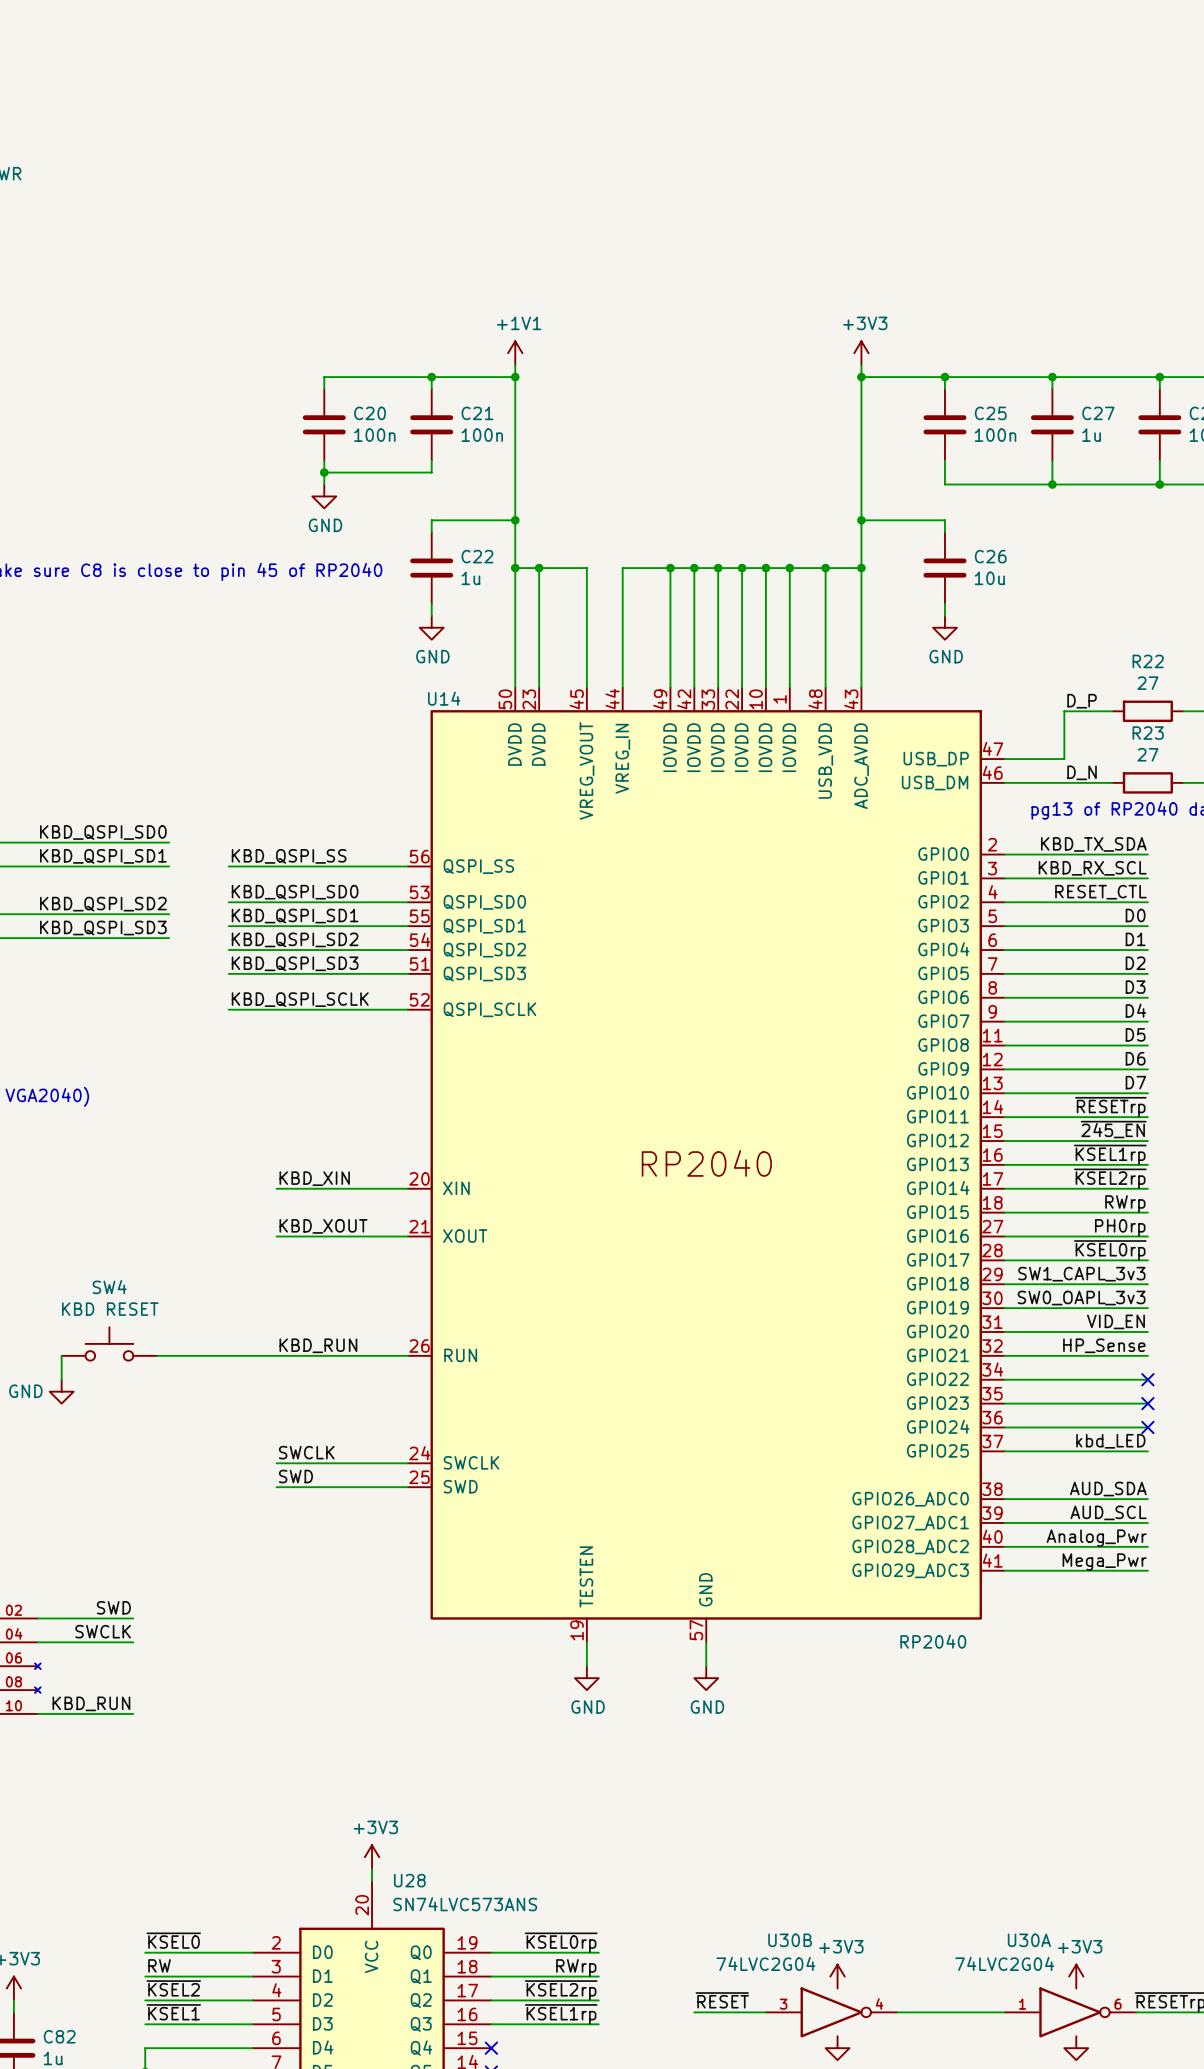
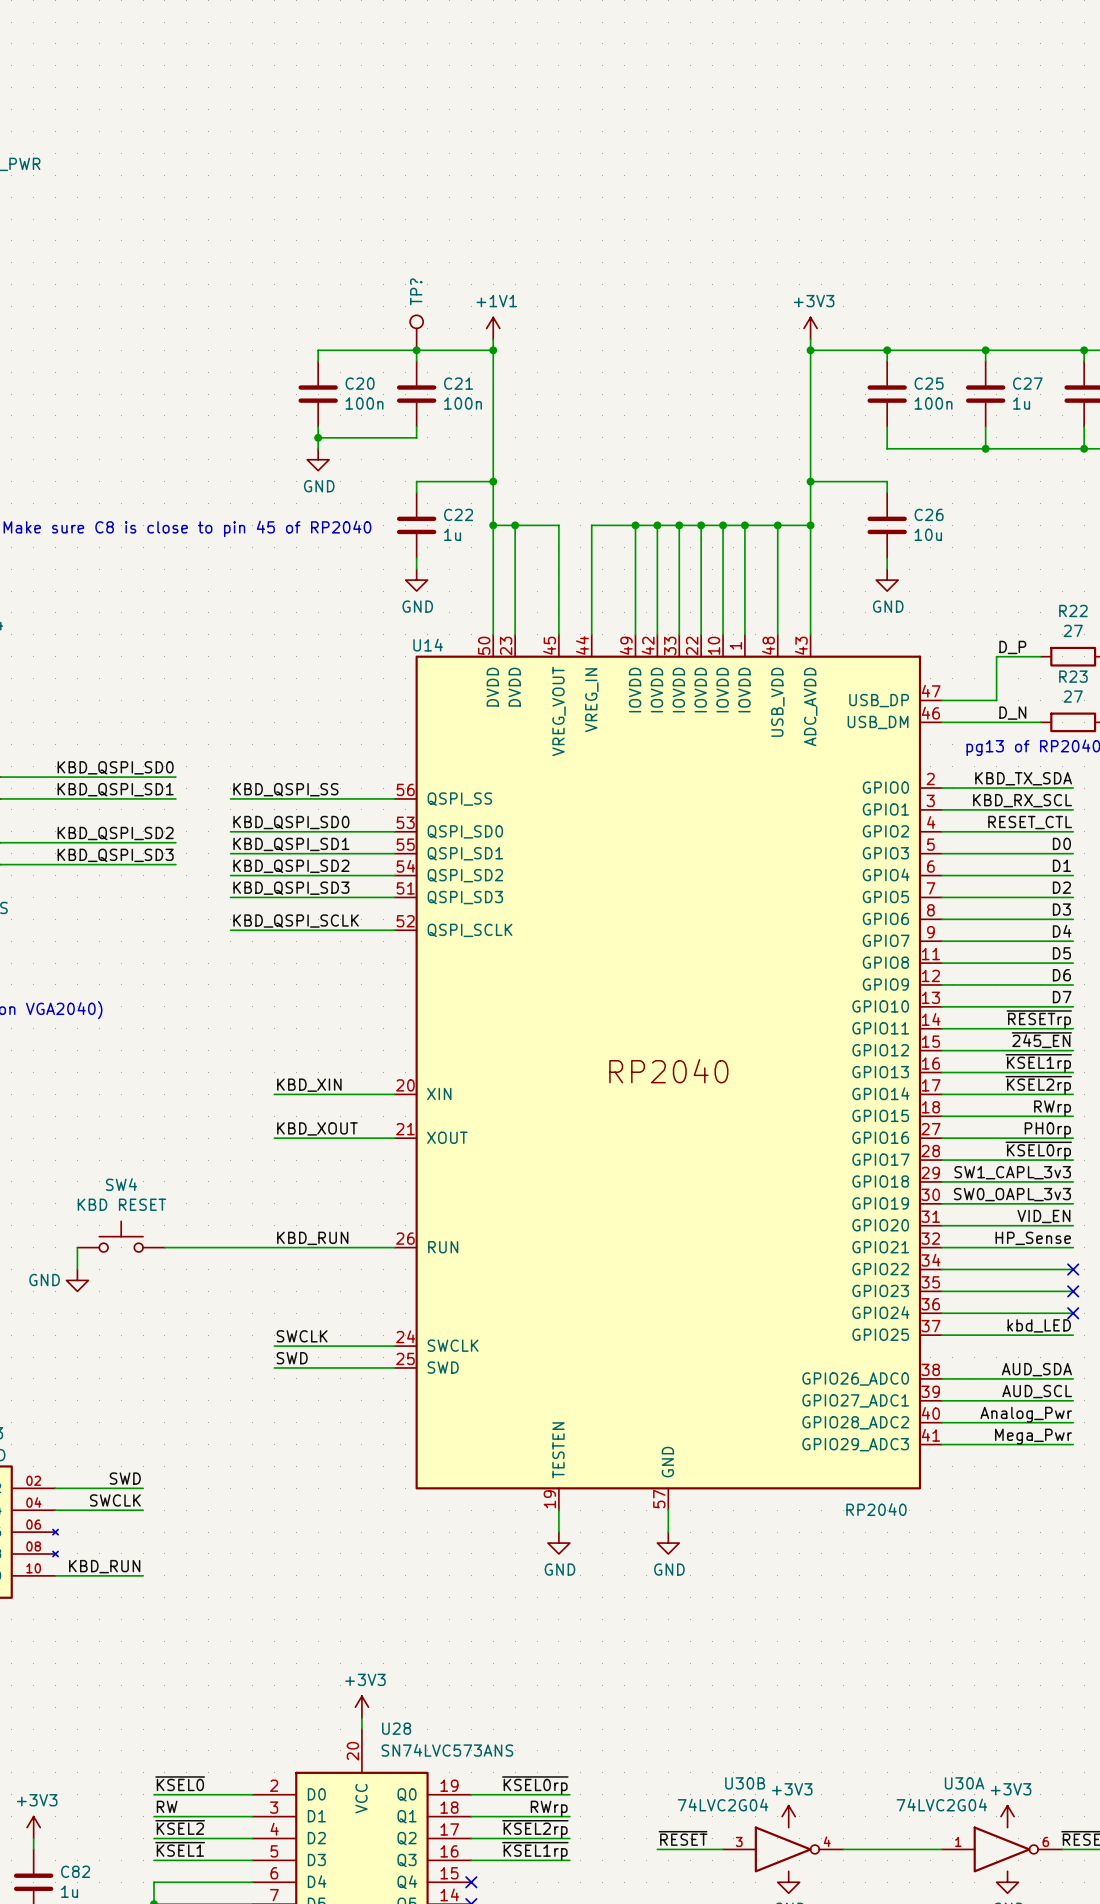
TP?: none -> (416, 332)

